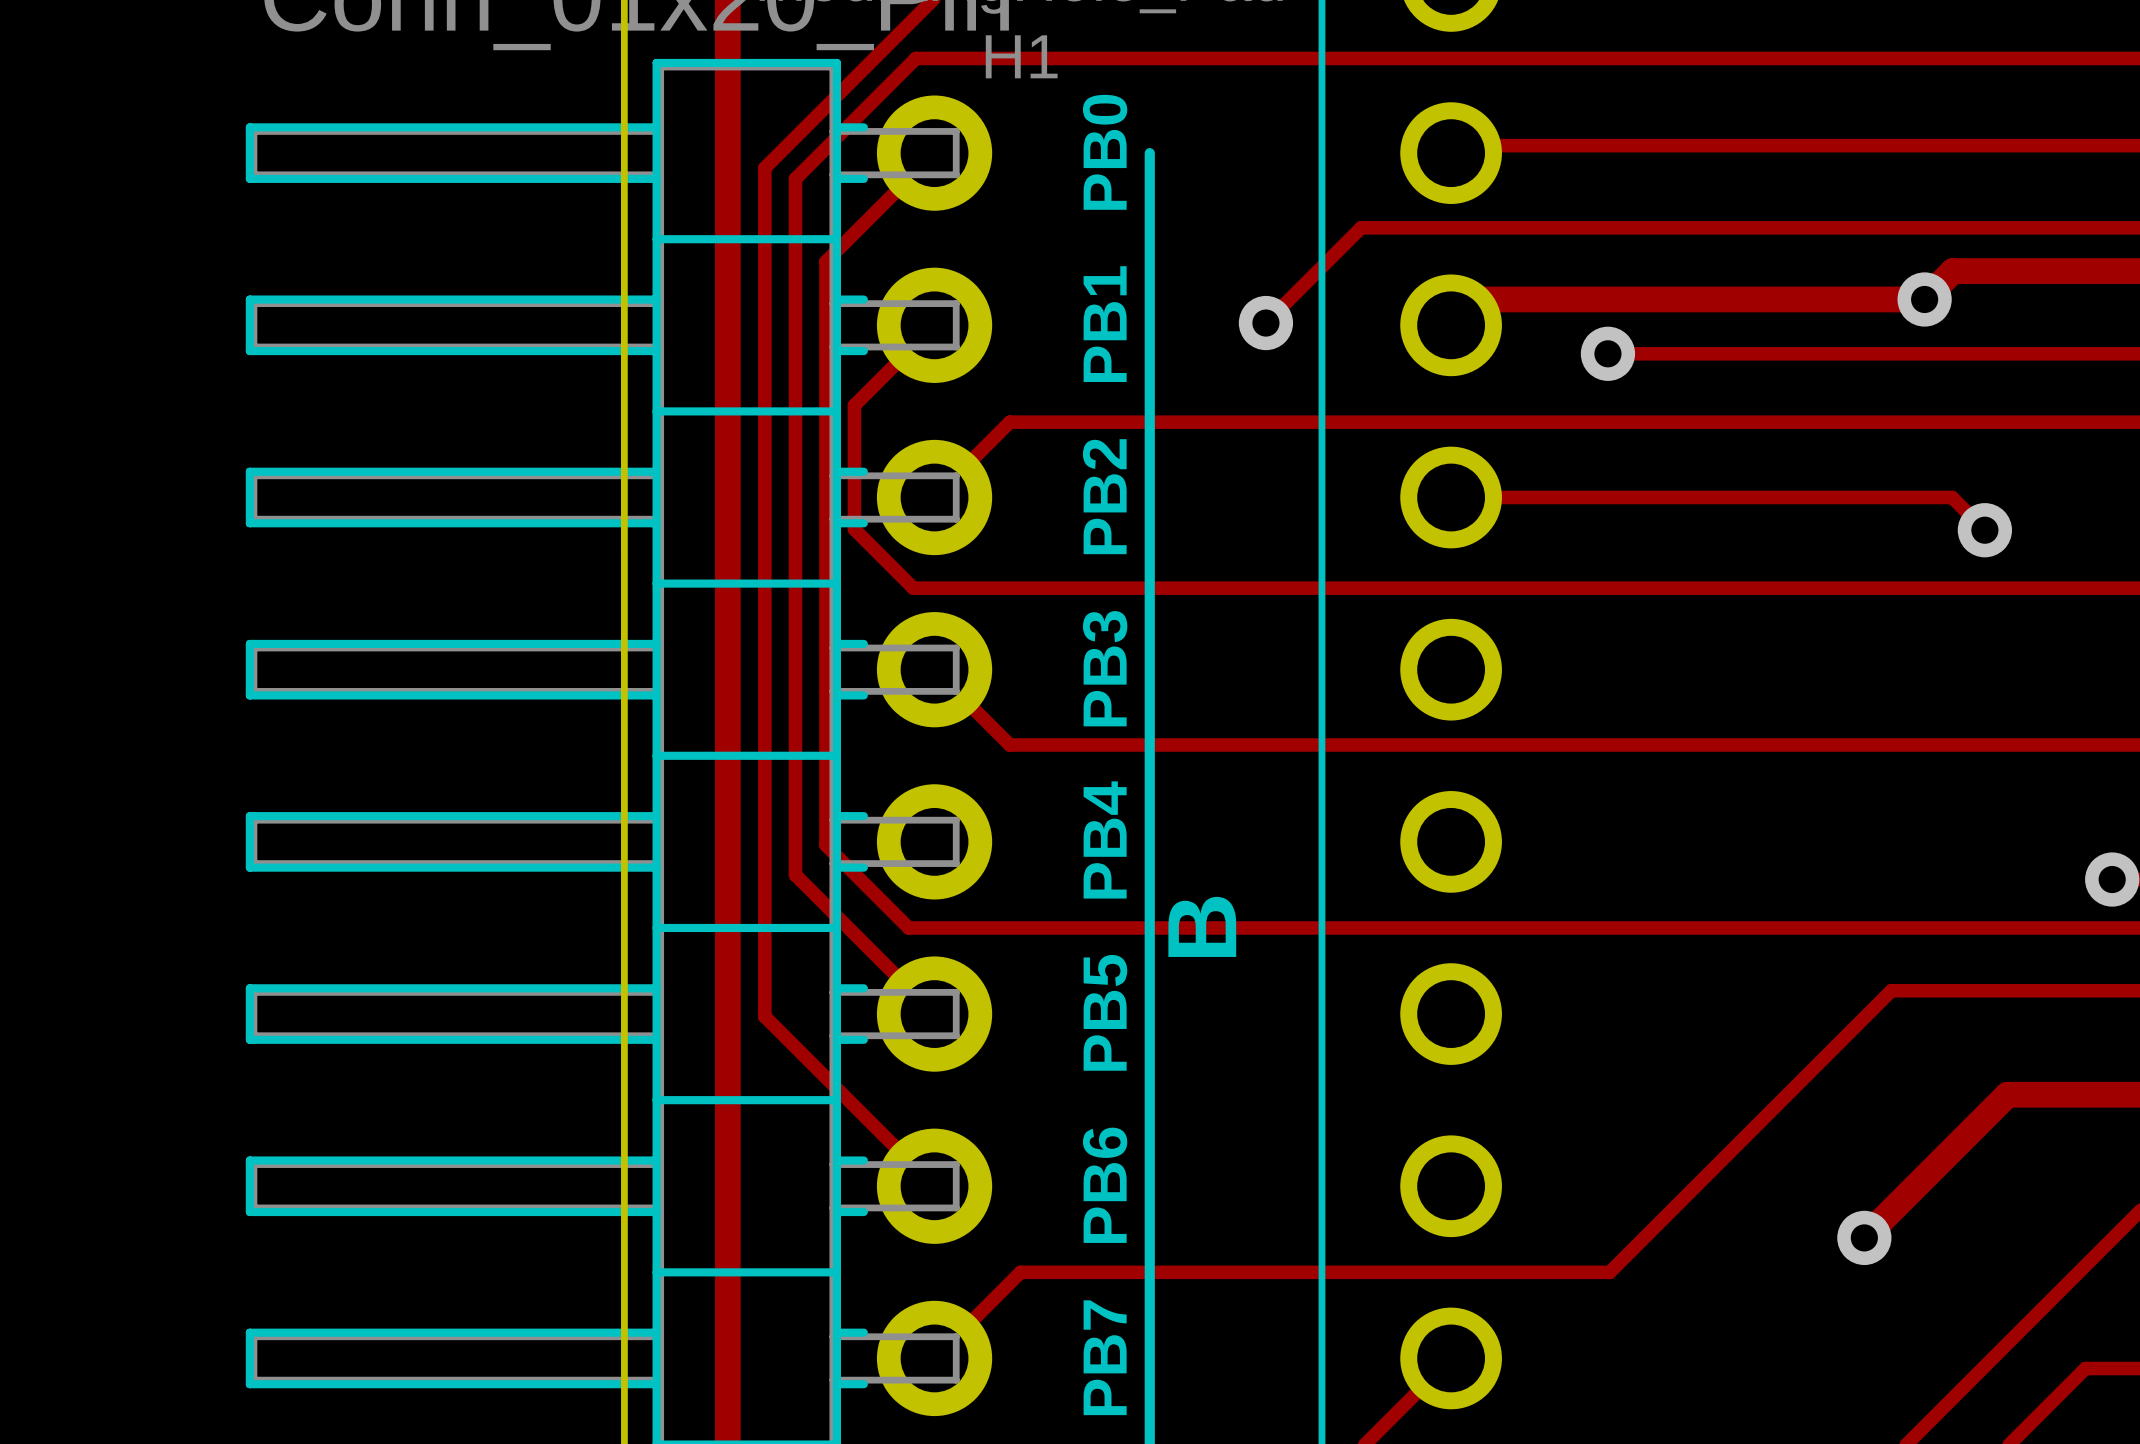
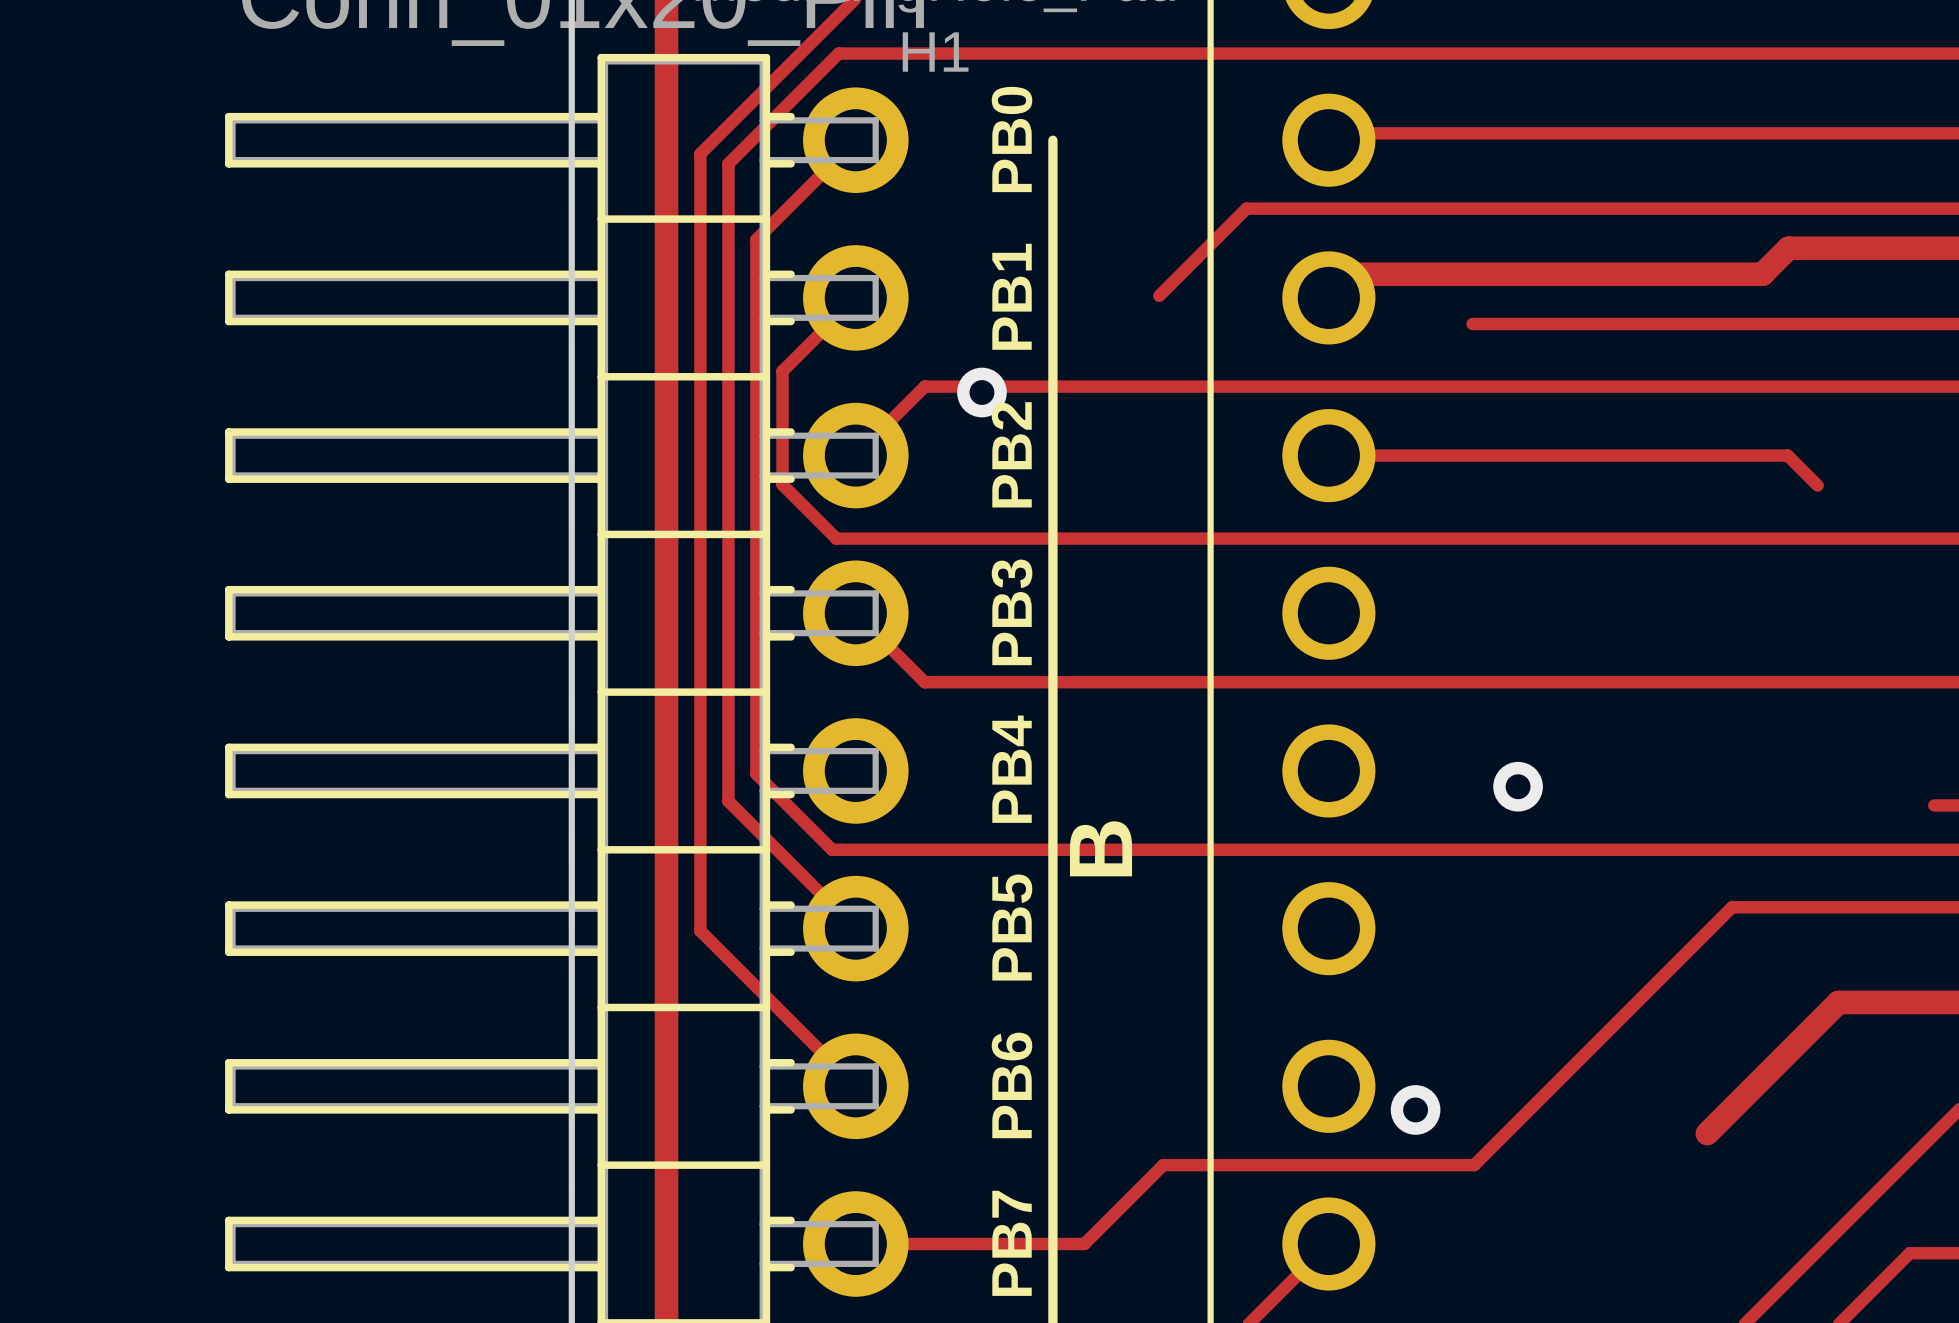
via: (1924, 299) -> none
via: (1265, 323) -> none
via: (1607, 353) -> none
via: none -> (981, 392)
via: (1984, 530) -> none
via: none -> (1518, 786)
via: (2112, 879) -> none
via: none -> (1415, 1109)
via: (1864, 1237) -> none
track: (1270, 1272) (1020, 1272) (934, 1358) -> (1163, 1165) (1084, 1244) (855, 1244)

